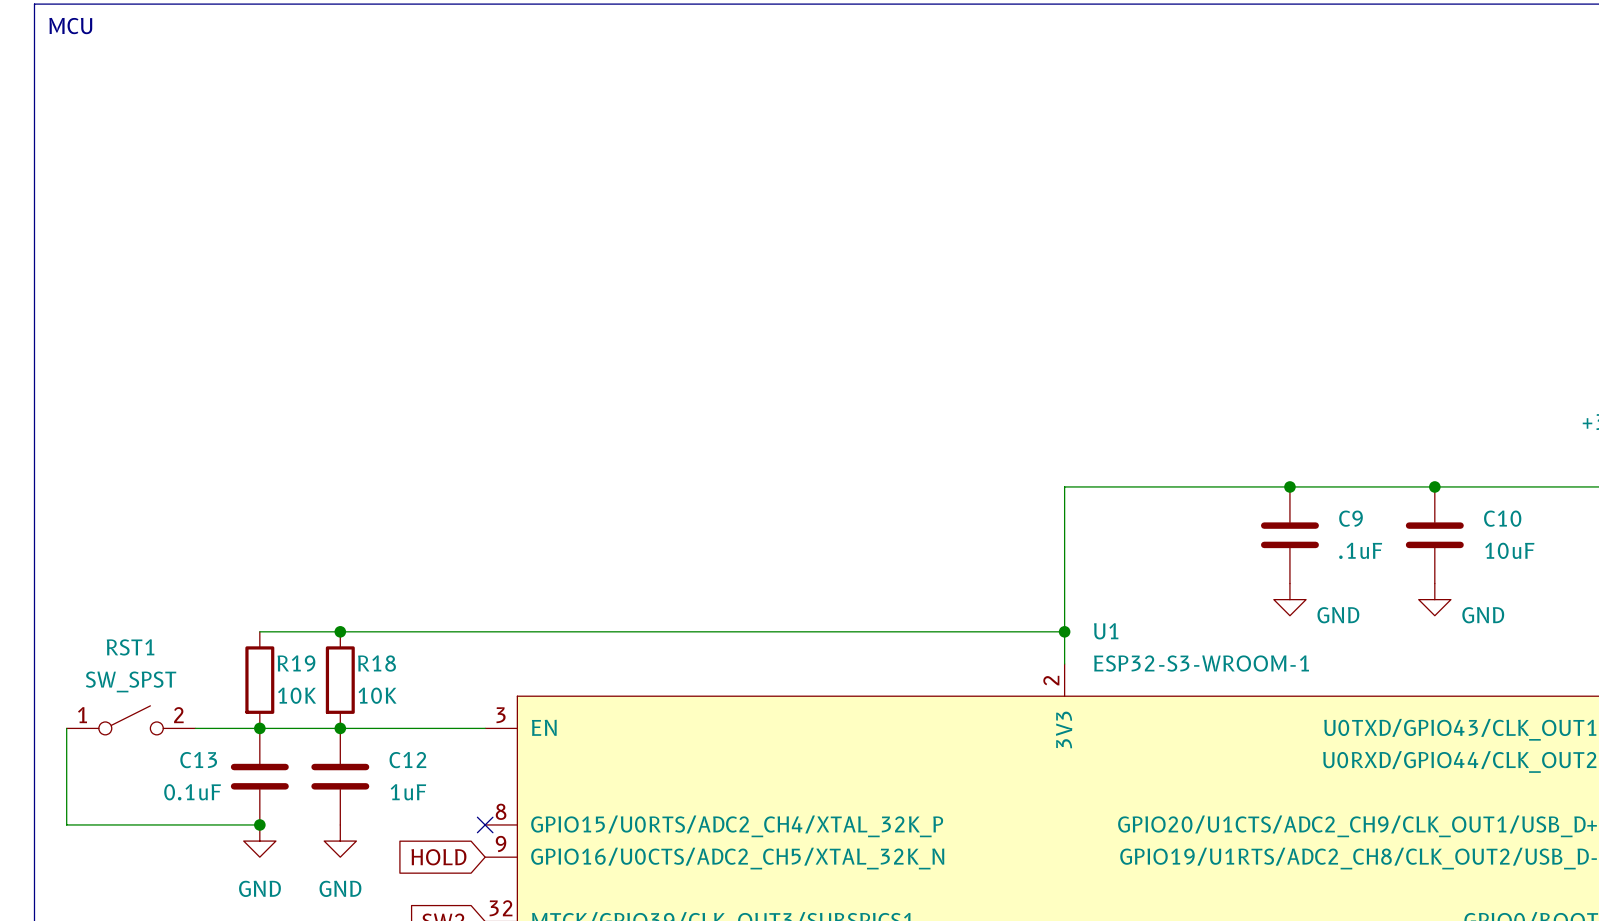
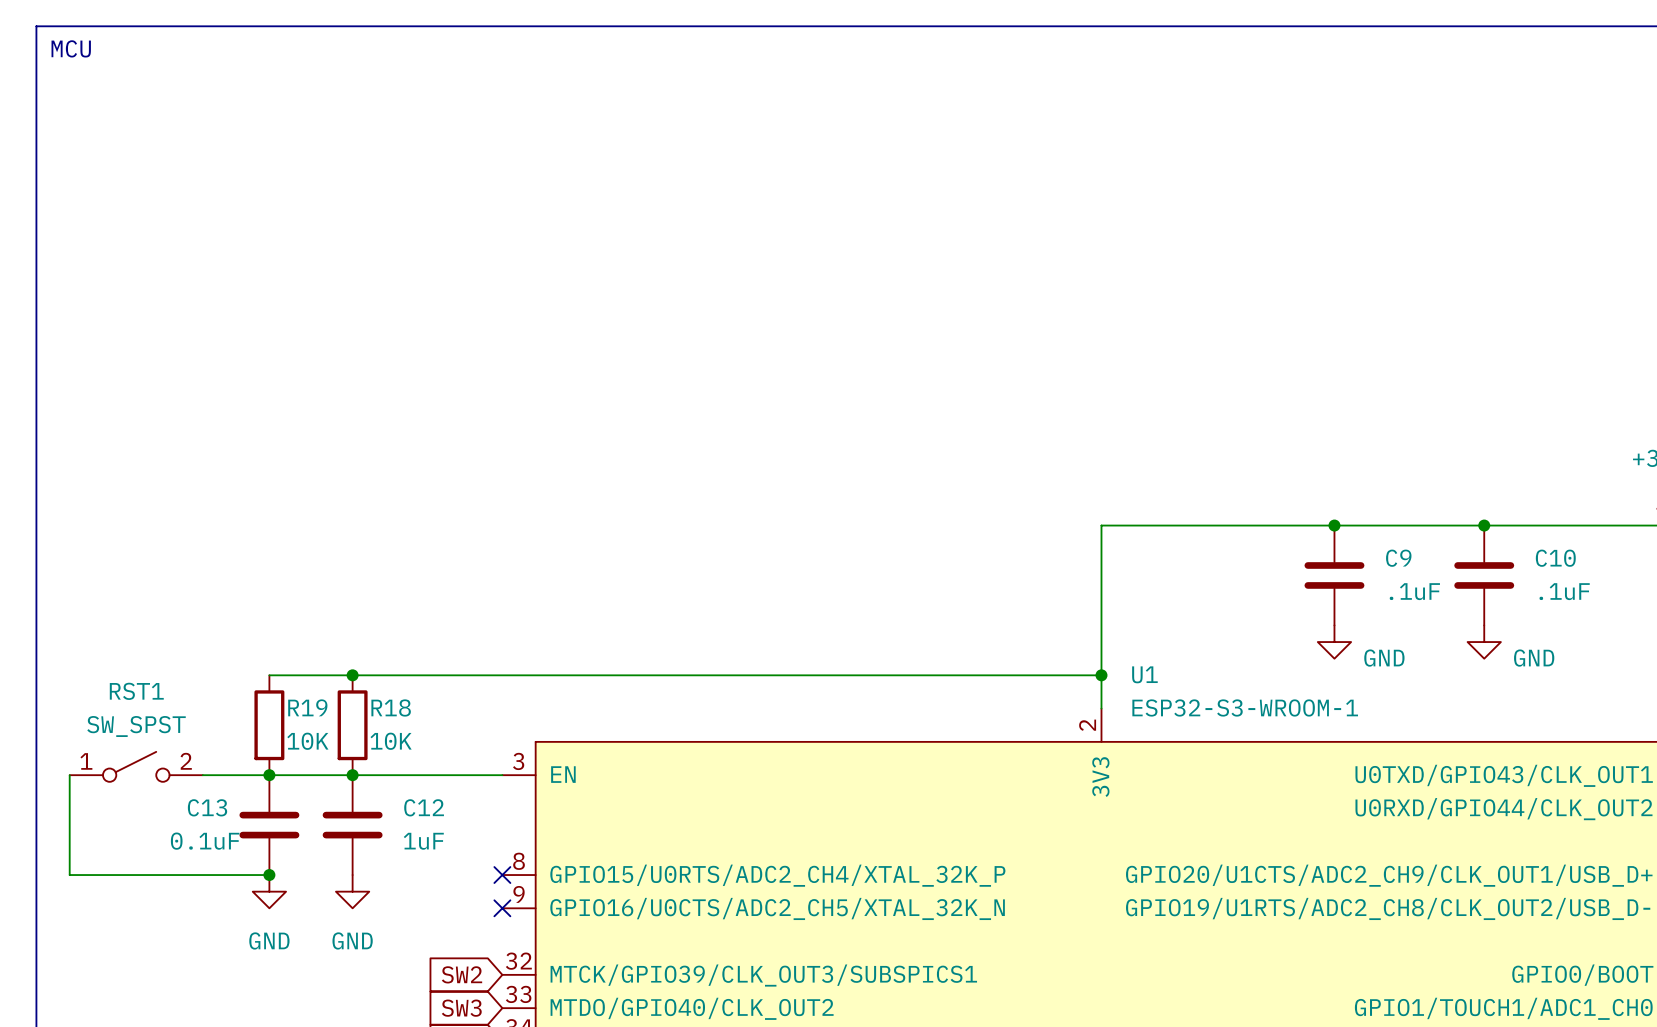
C10 value: 10uF (1509, 550) -> .1uF (1564, 591)
global label: HOLD (438, 857) -> none
no-connect mark: none -> (502, 908)

